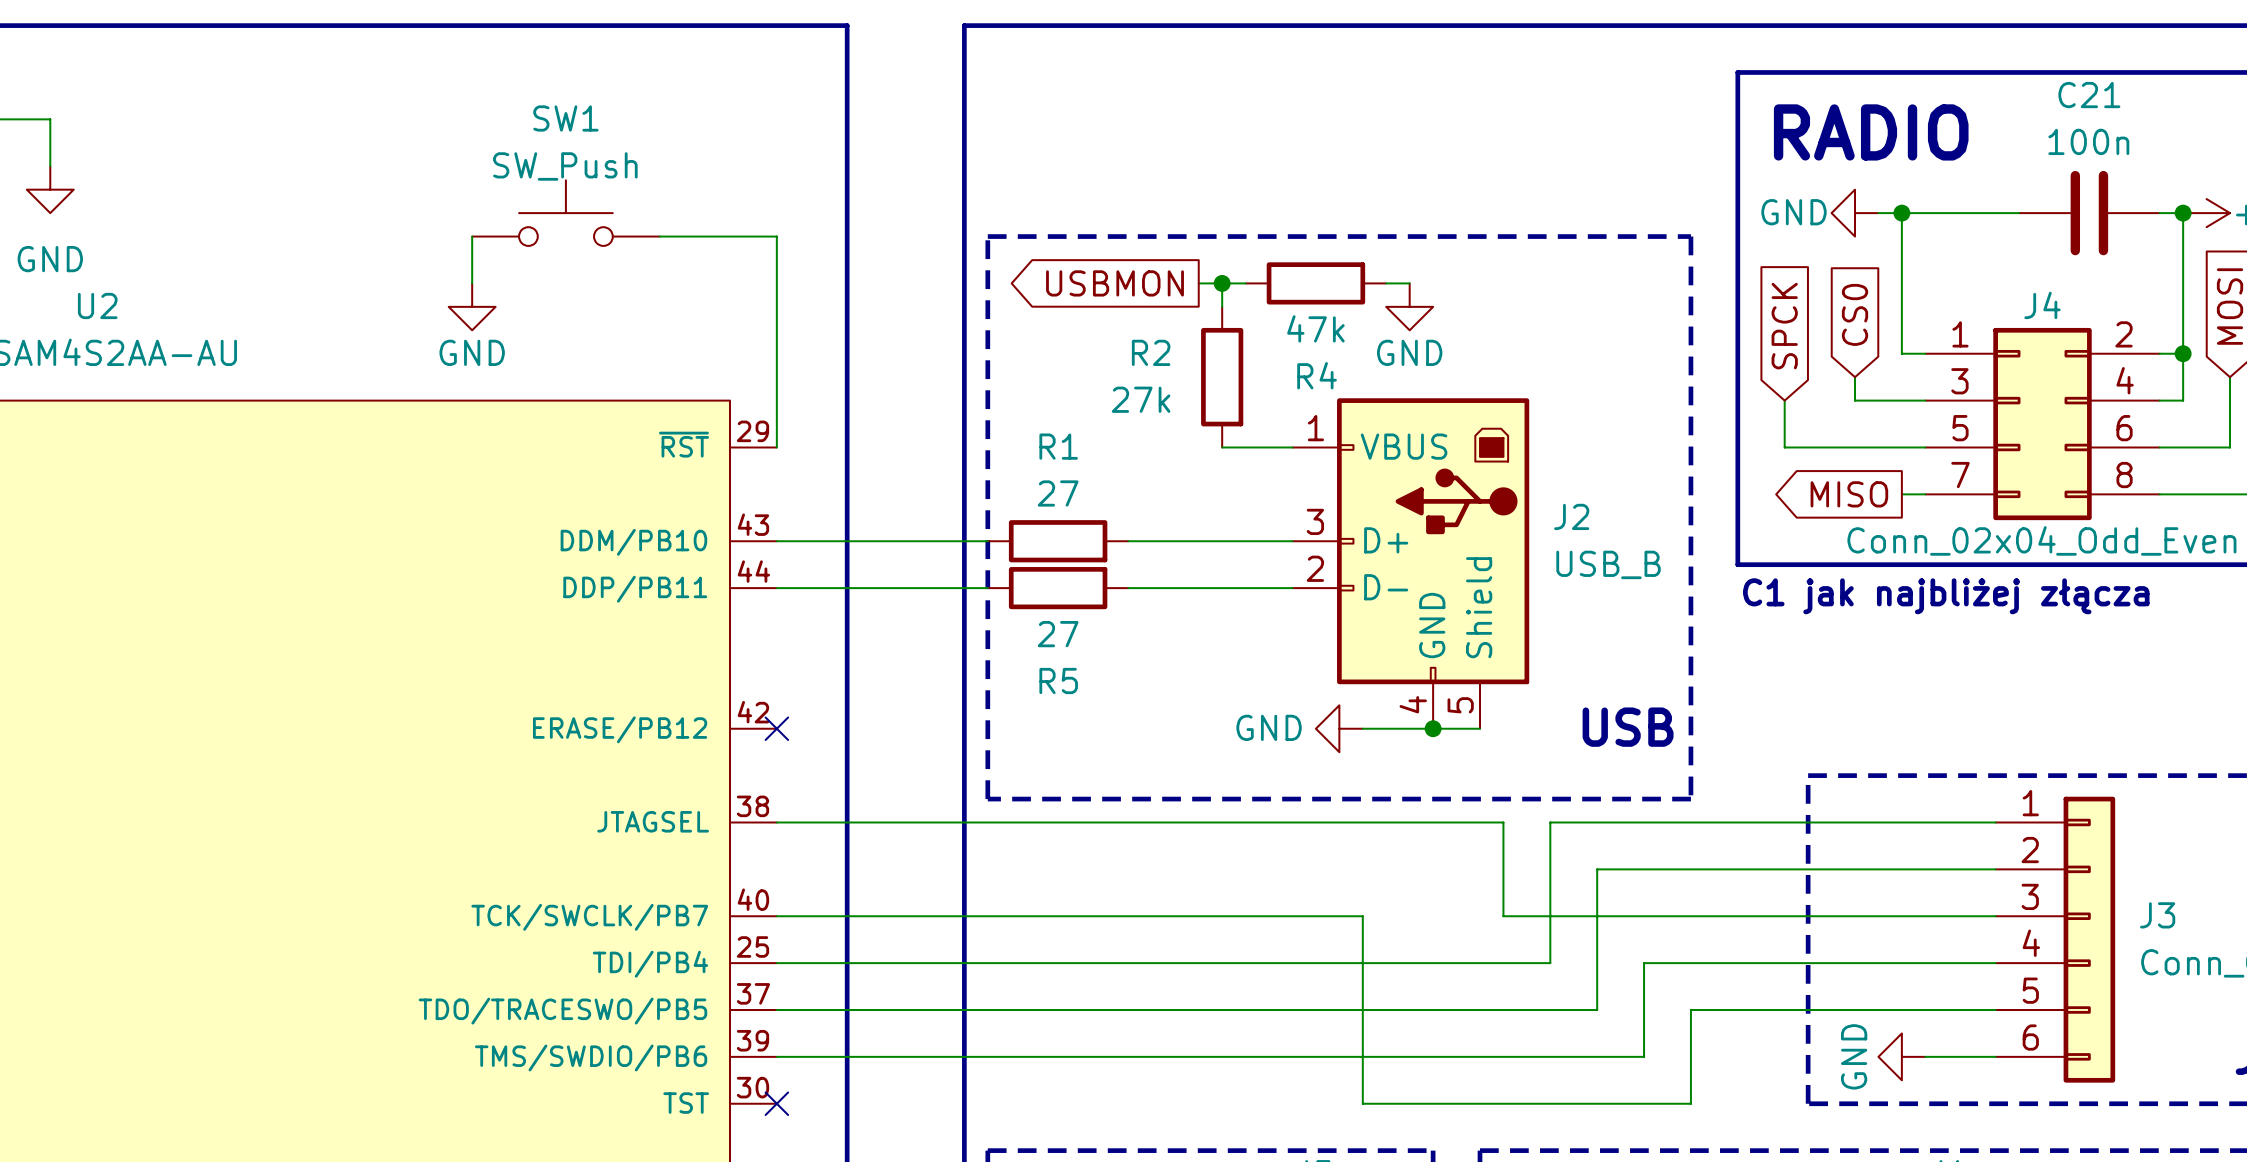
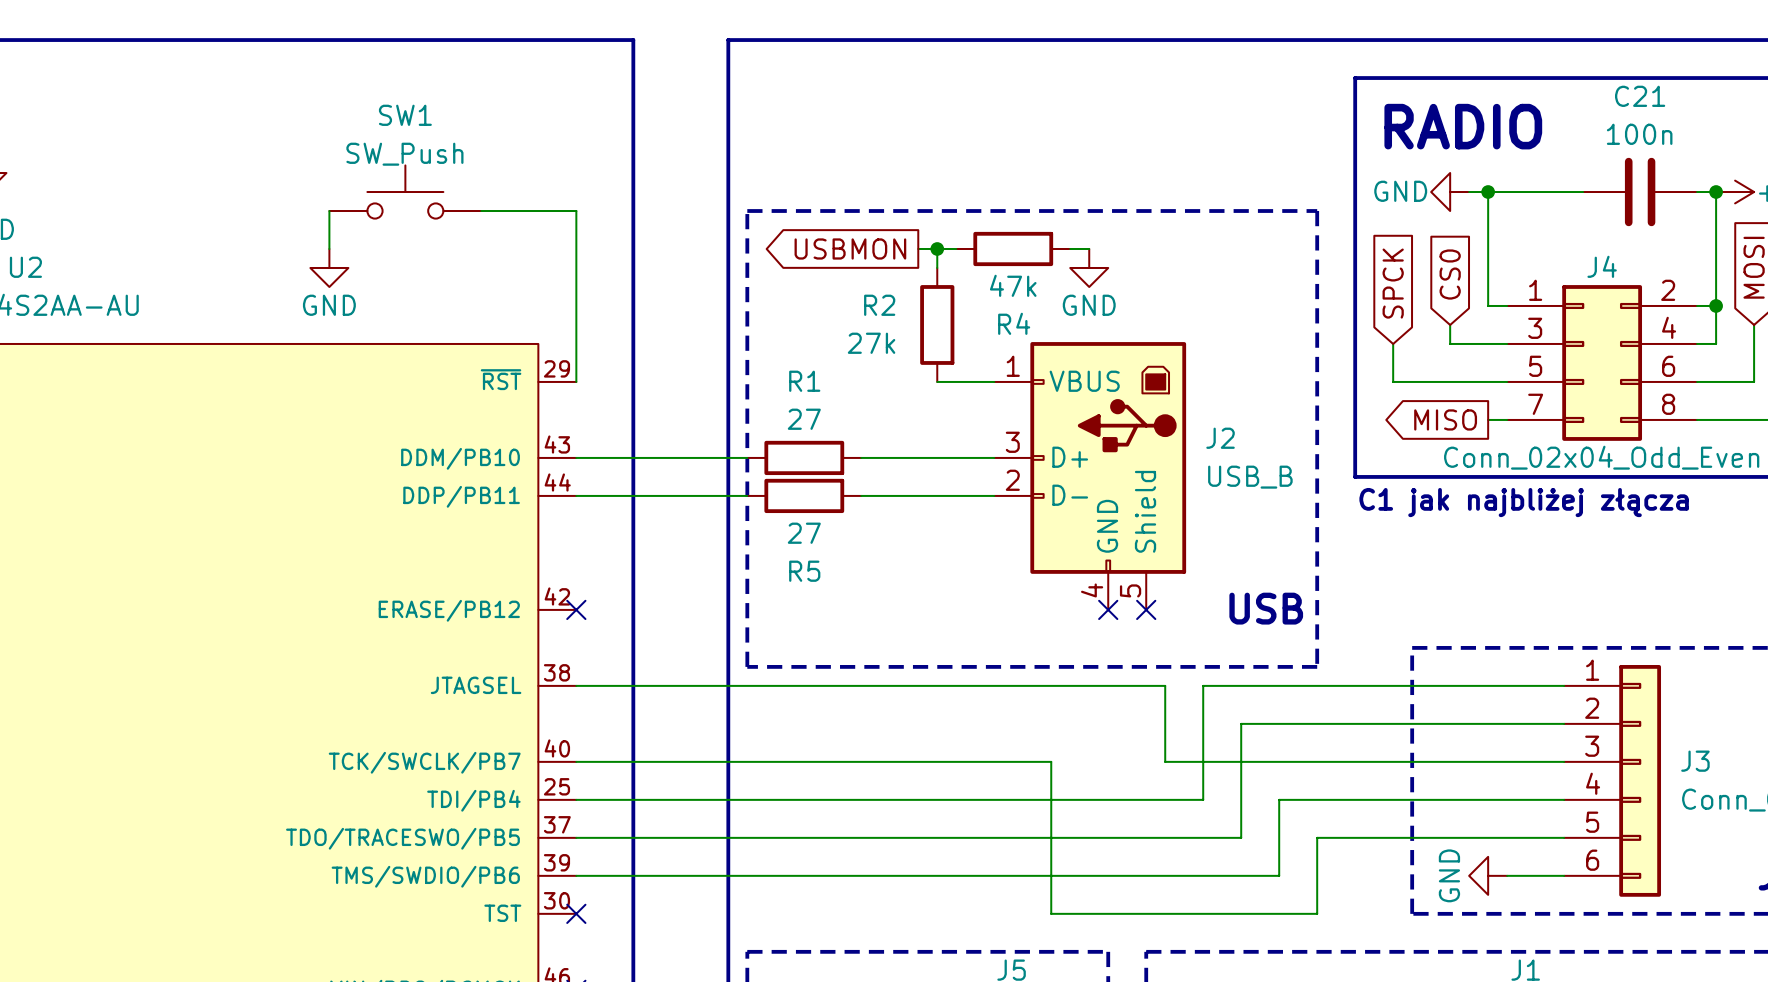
power symbol: GND (1339, 728) -> none
wire: (1362, 728) (1480, 728) -> none
junction: (1433, 728) -> none
no-connect mark: none -> (1108, 609)
no-connect mark: none -> (1146, 609)

